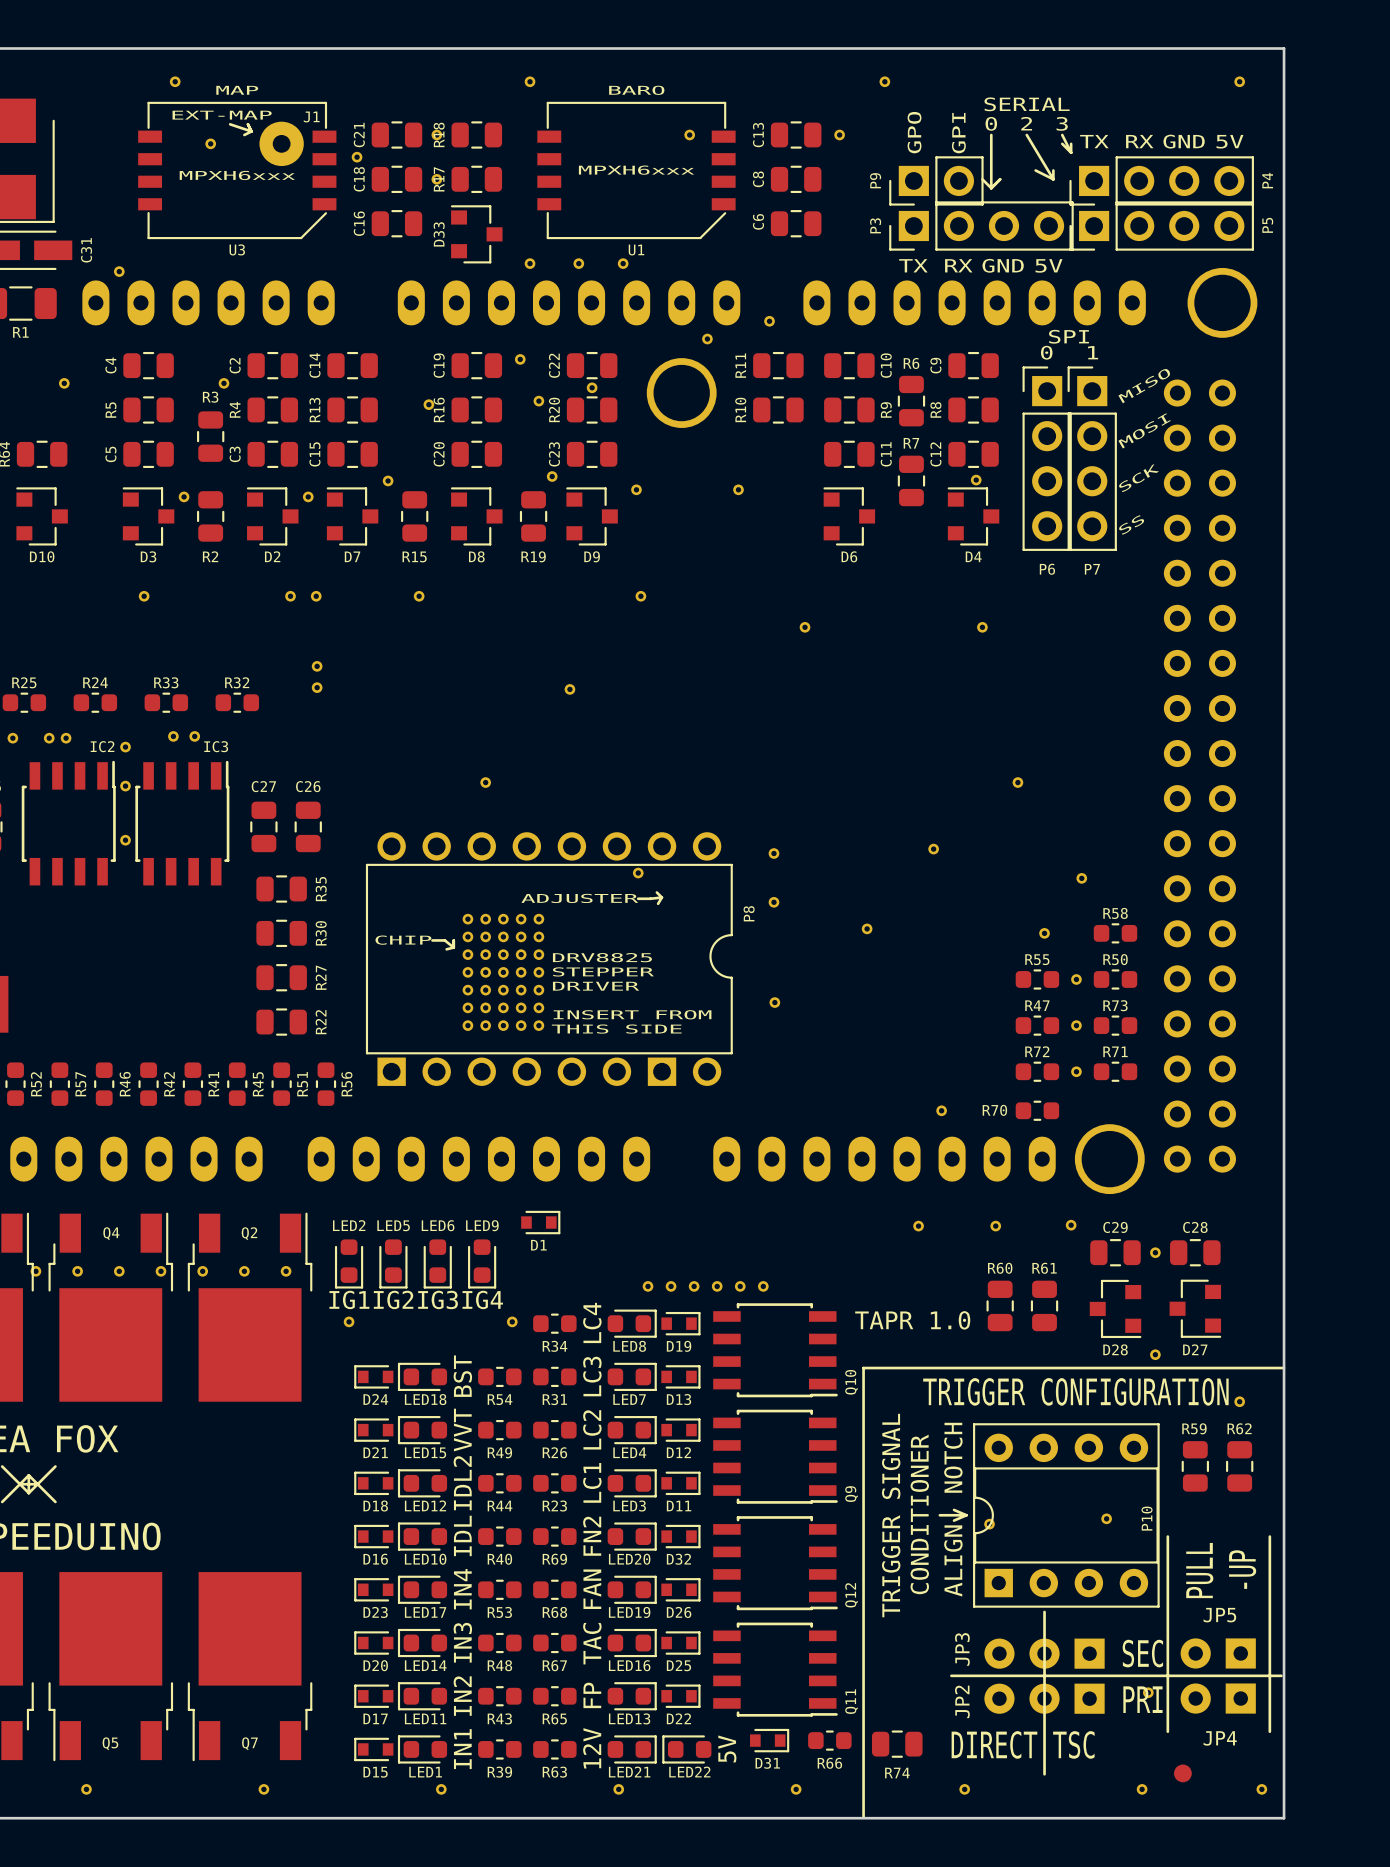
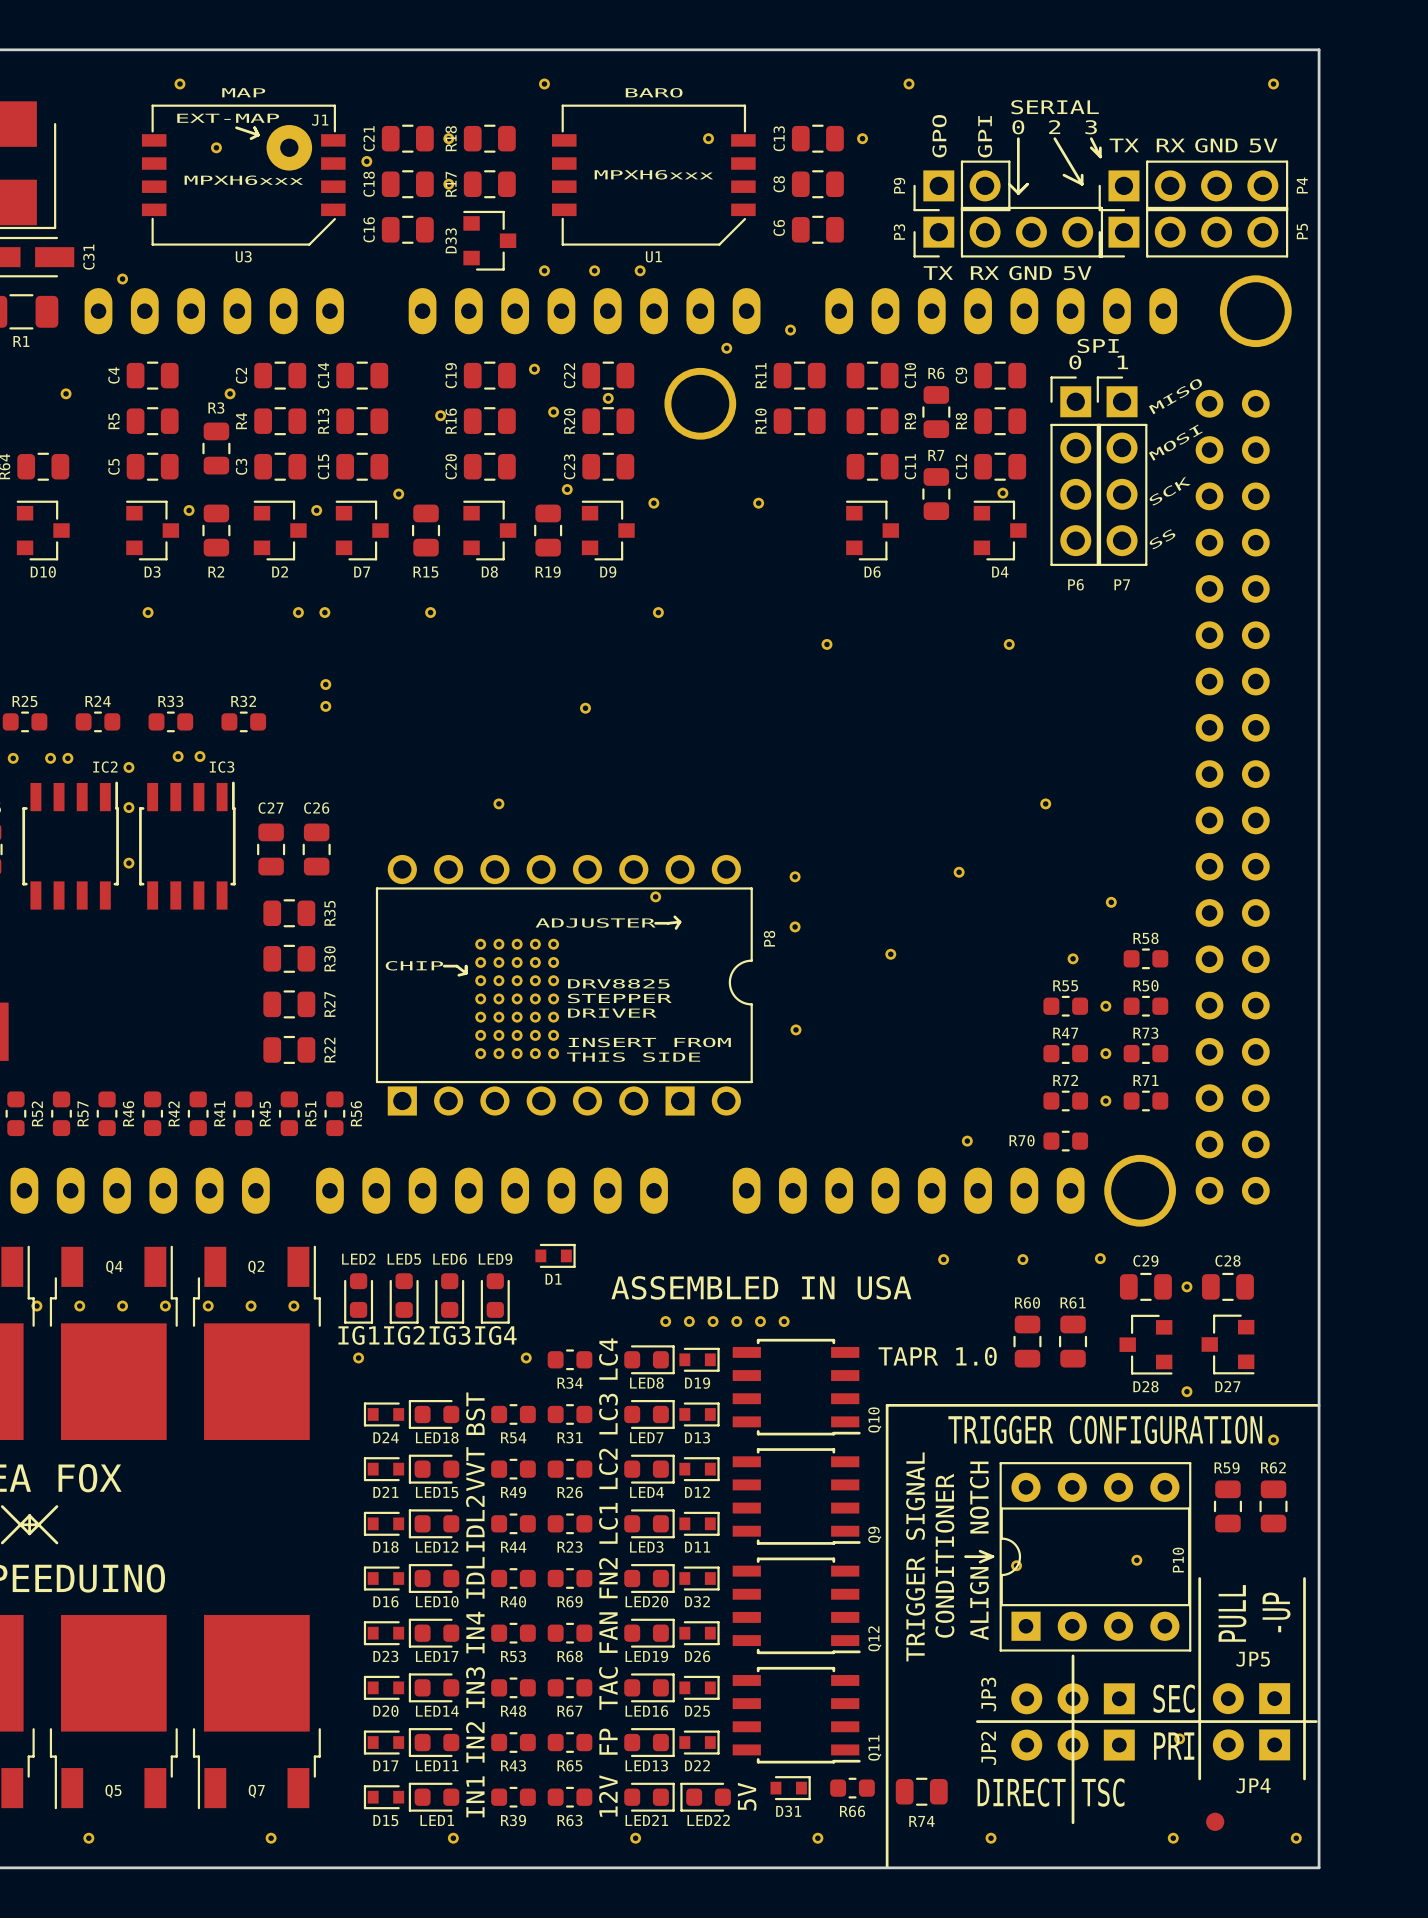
text: none -> ASSEMBLED IN USA (761, 1287)

